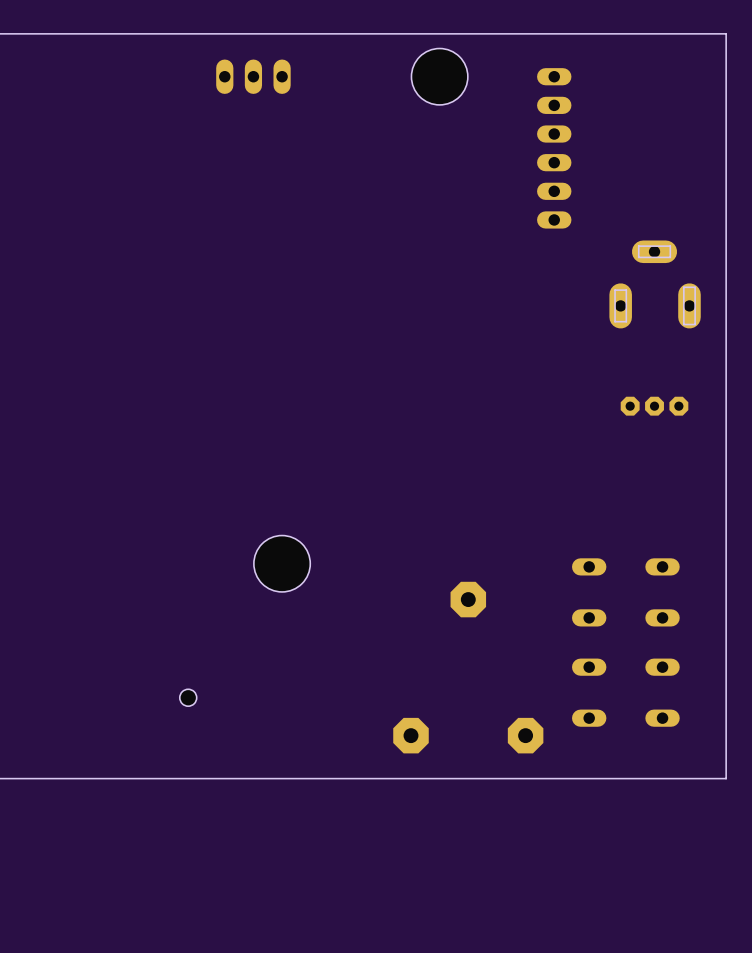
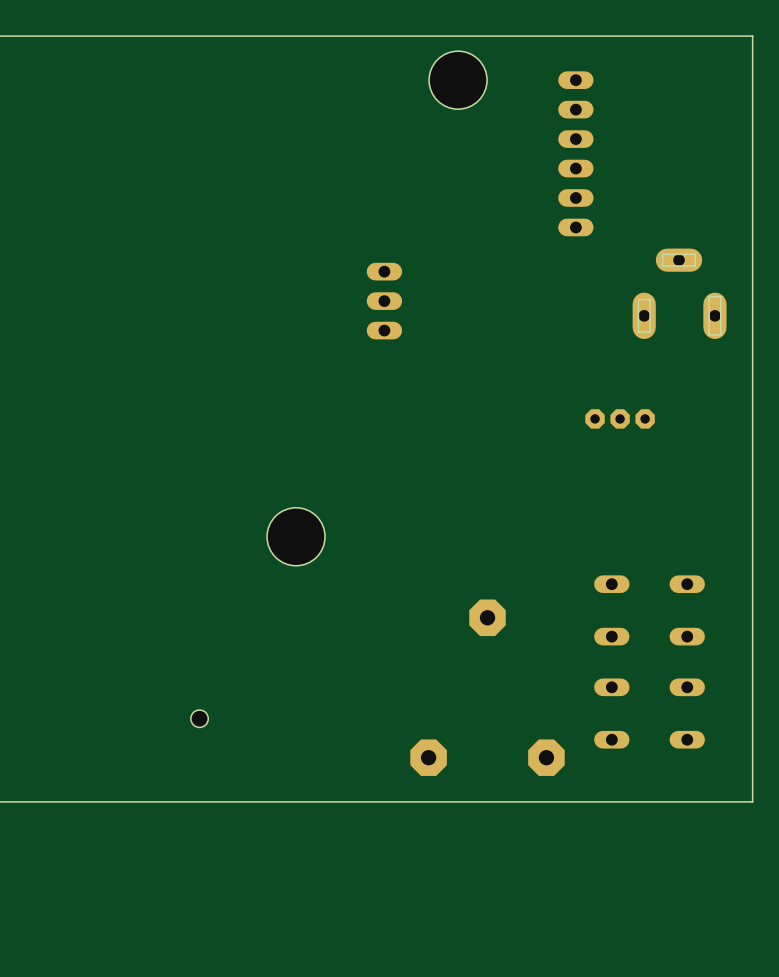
part rotation: 0° (253, 76) -> 90° clockwise (384, 301)
part position: (253, 76) -> (384, 301)
part position: (654, 406) -> (620, 418)
hole position: (282, 563) -> (296, 536)

